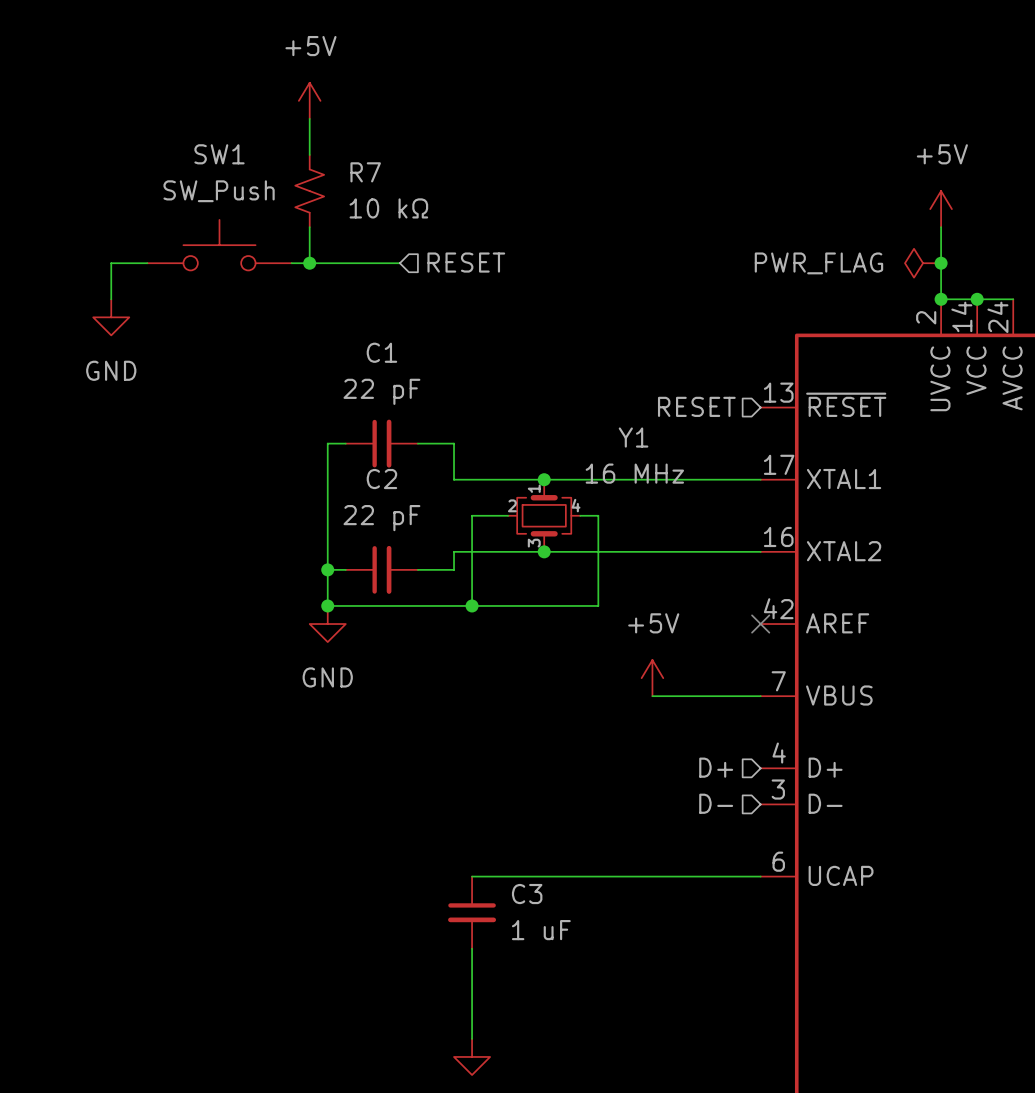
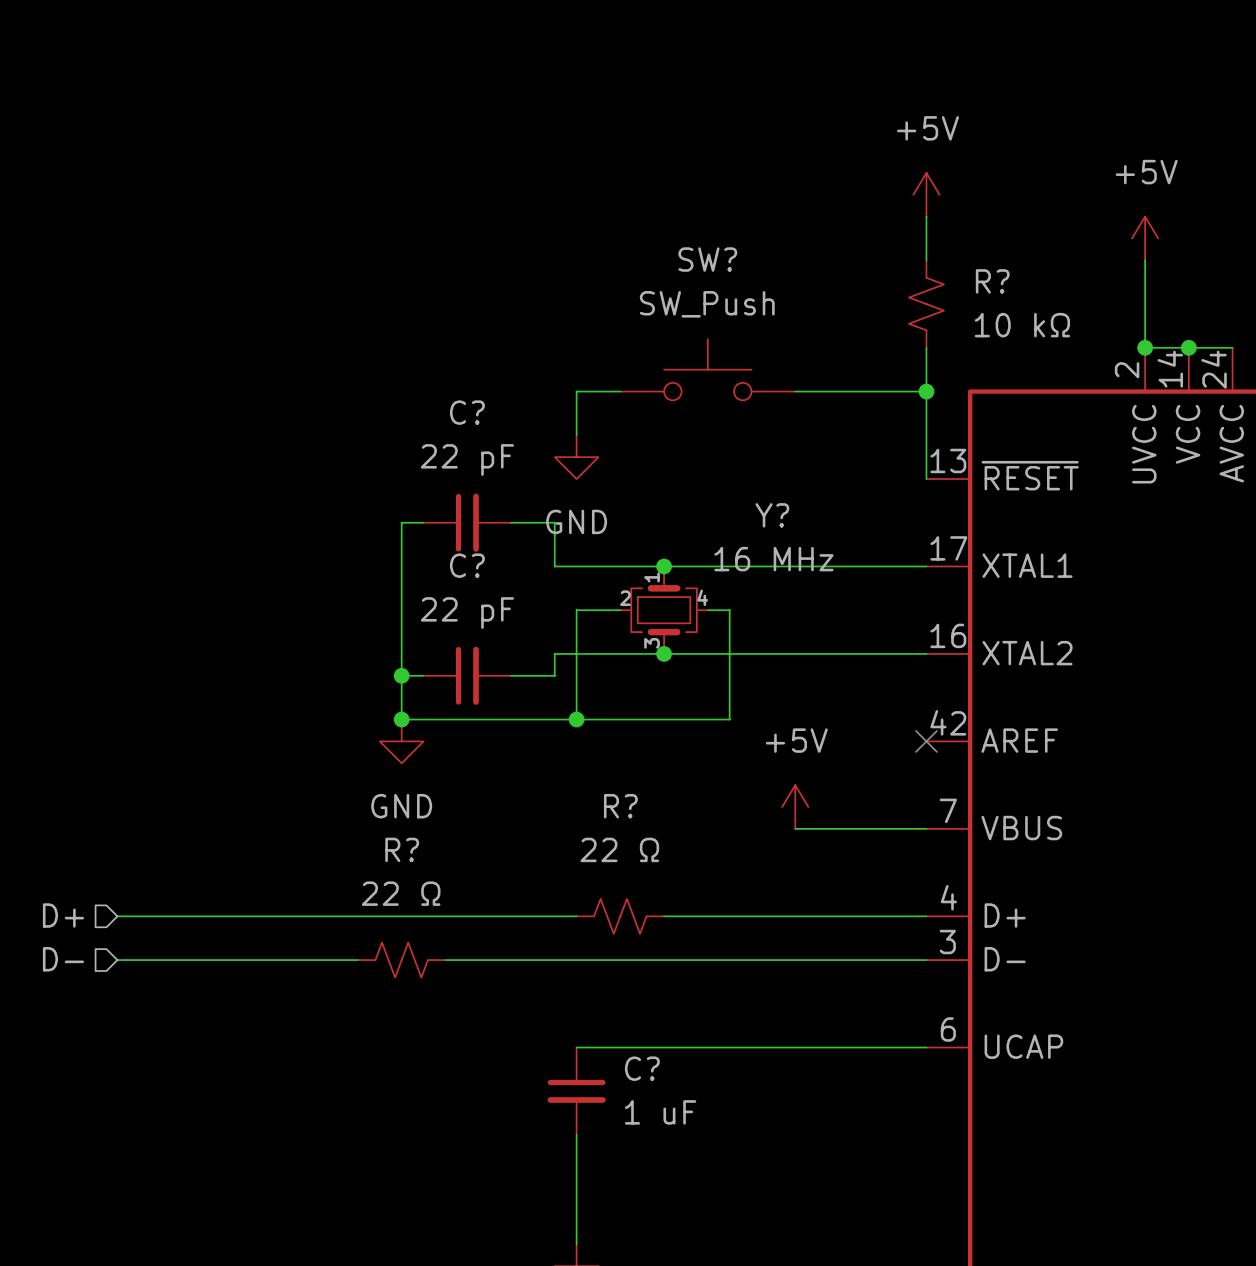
power symbol: +5V (309, 100) -> none
wire: (309, 118) (309, 154) -> none
power symbol: none -> +5V (926, 194)
R7: 10 kΩ (309, 191) -> none
wire: none -> (926, 216) (926, 260)
wire: (309, 227) (309, 263) -> none
SW1: SW_Push (219, 245) -> none
hierarchical label: RESET (466, 262) -> none
wire: (147, 263) (111, 263) (111, 299) -> none
wire: (291, 263) (399, 263) -> none
junction: (309, 263) -> none
R?: none -> 10 kΩ (926, 304)
power symbol: PWR_FLAG (923, 263) -> none
junction: (941, 263) -> none
wire: none -> (926, 347) (926, 479)
power symbol: GND (111, 317) -> none
SW?: none -> SW_Push (707, 369)
wire: none -> (620, 391) (576, 391) (576, 435)
wire: none -> (795, 391) (926, 391)
junction: none -> (926, 391)
C1 name: C1 (381, 352) -> C? (467, 412)
power symbol: none -> GND (576, 457)
hierarchical label: RESET (696, 406) -> none
Y1 name: Y1 (633, 437) -> Y? (772, 515)
C2 name: C2 (381, 479) -> C? (467, 565)
hierarchical label: none -> D+ (63, 915)
hierarchical label: D+ (716, 767) -> none
wire: none -> (117, 916) (576, 916)
R?: none -> 22 Ω (620, 916)
wire: none -> (664, 916) (926, 916)
hierarchical label: none -> D- (63, 959)
hierarchical label: D- (716, 803) -> none
wire: none -> (117, 960) (357, 960)
R?: none -> 22 Ω (401, 960)
wire: none -> (445, 960) (926, 960)
C3 name: C3 (527, 894) -> C? (642, 1068)

